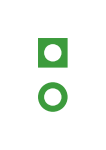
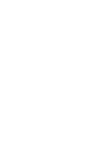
part: (52, 74) -> none

